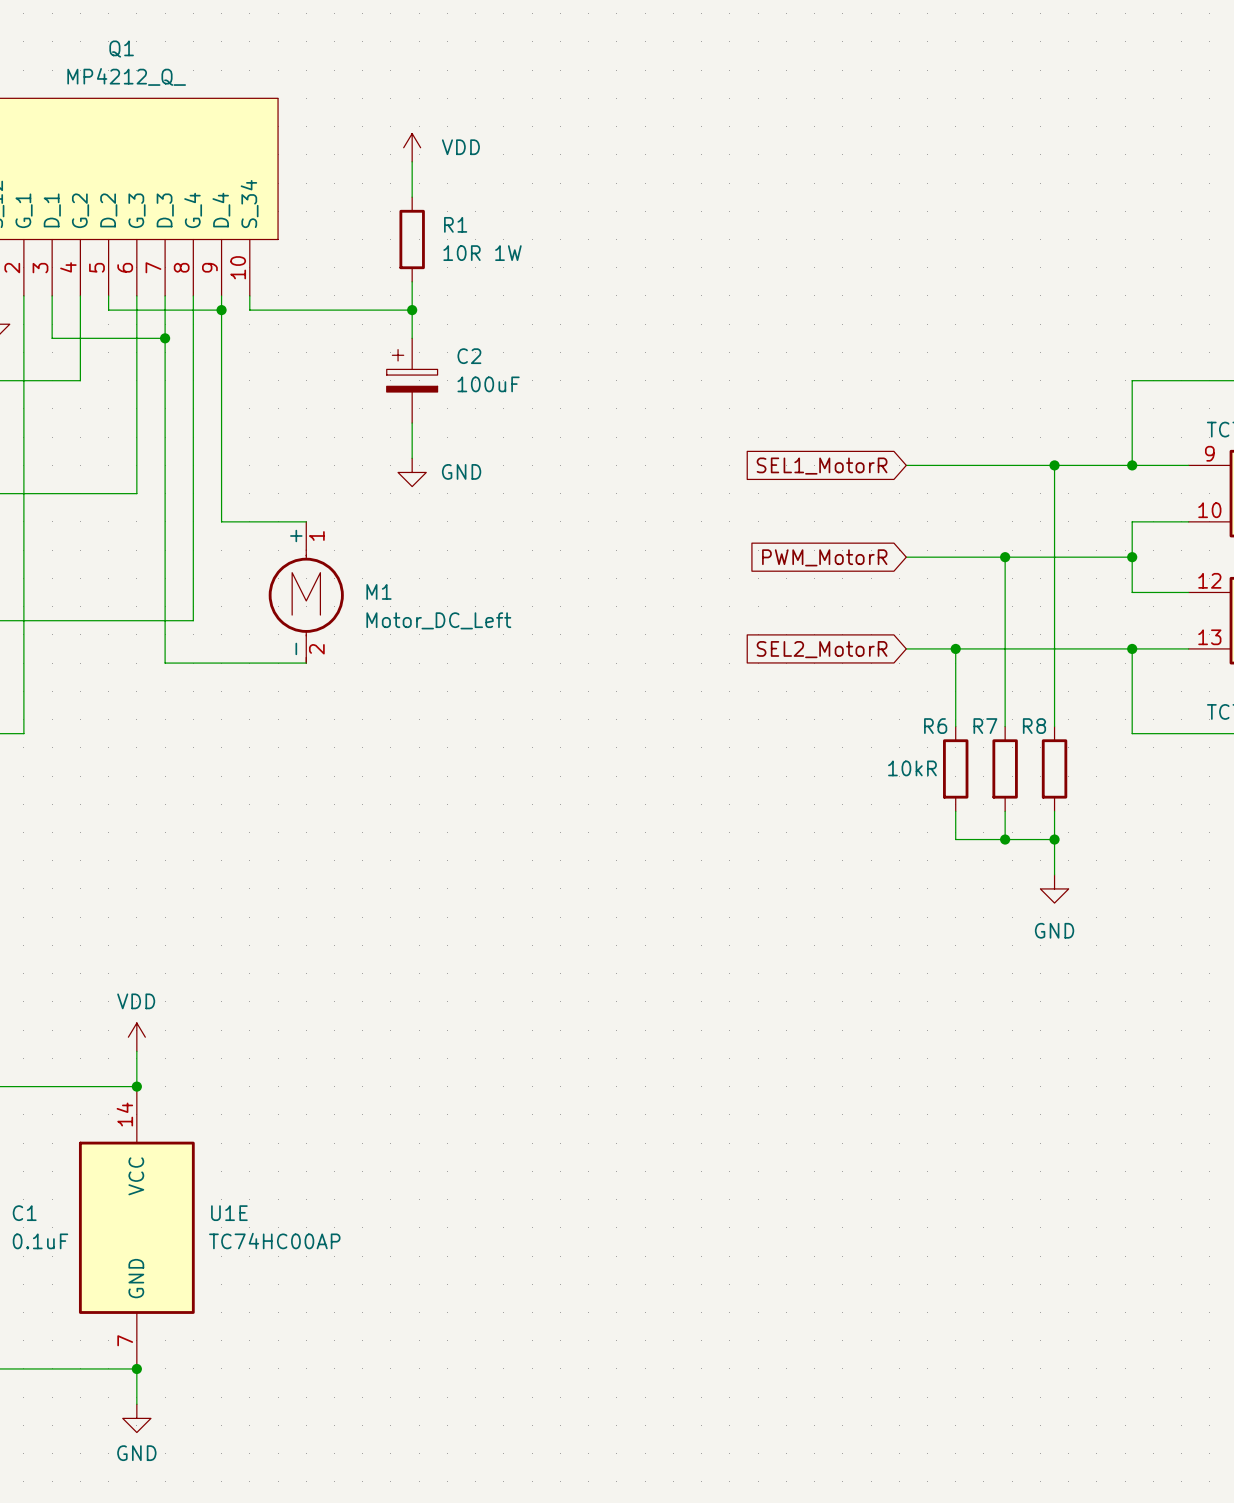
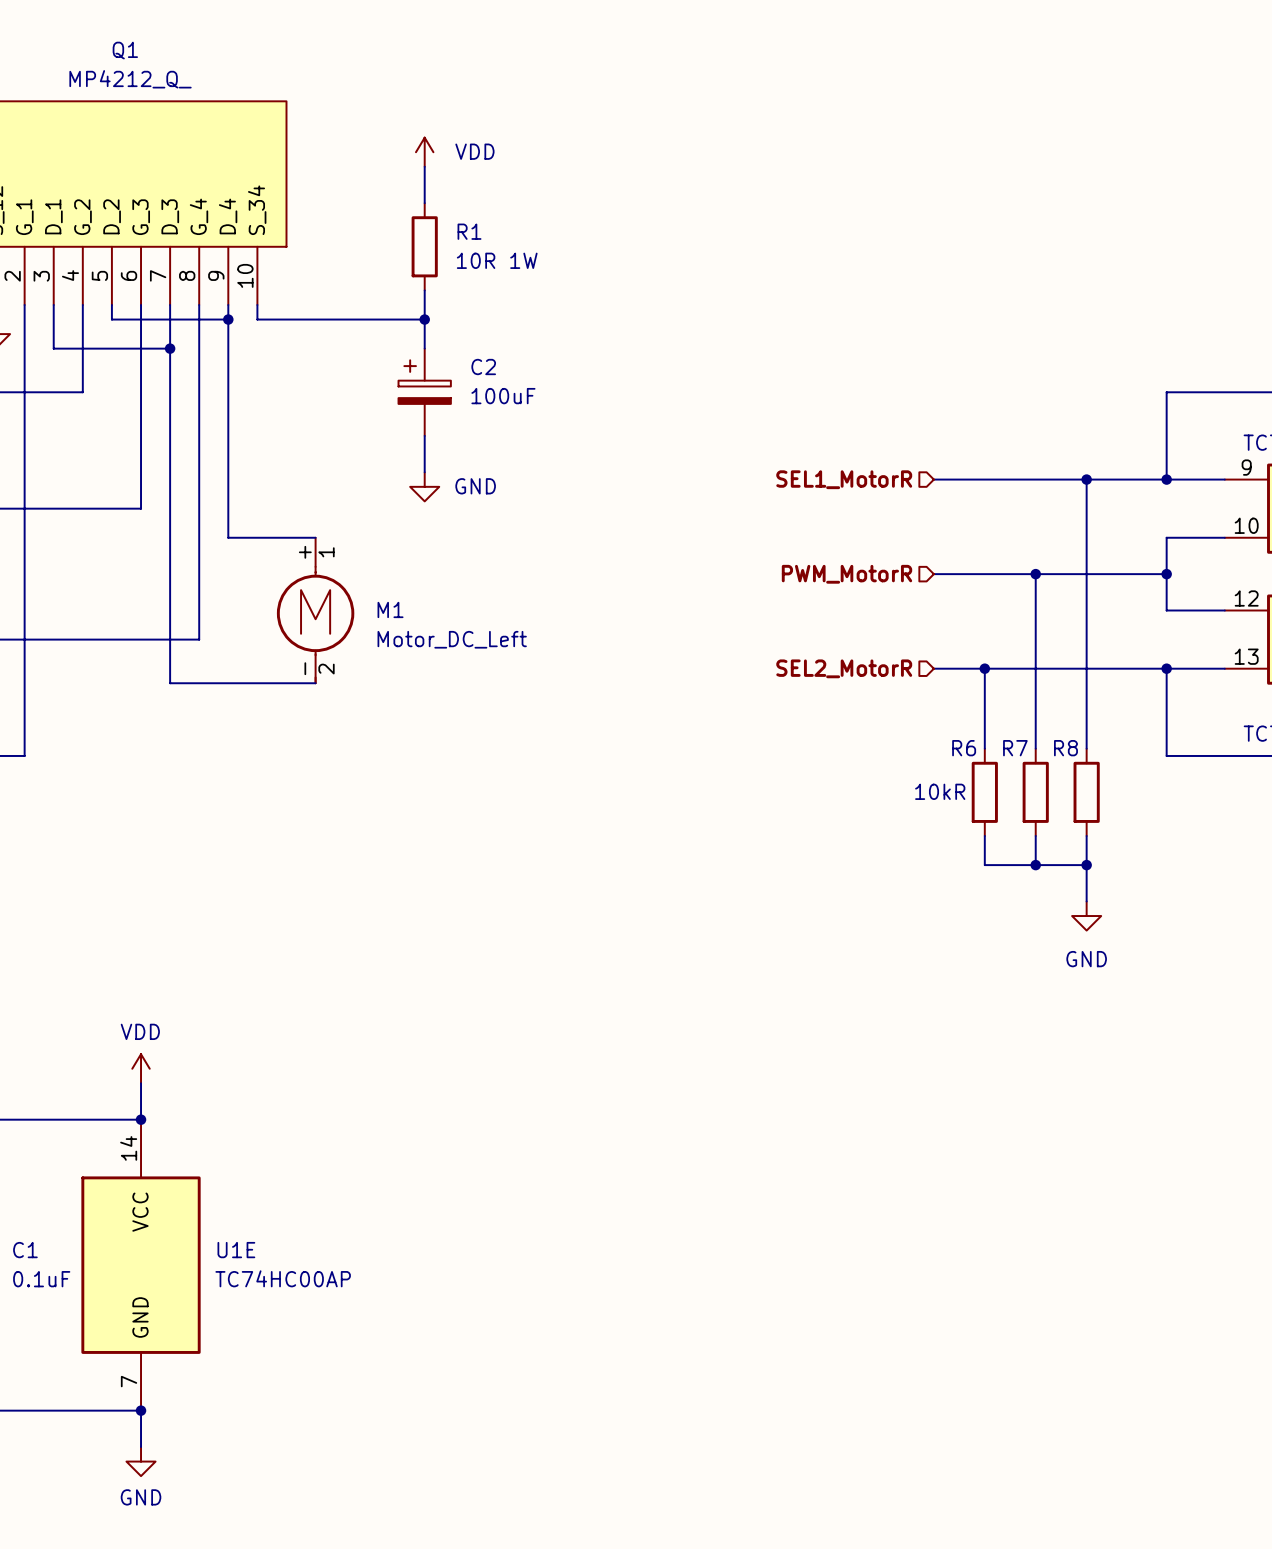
hierarchical label: none -> SEL1_MotorR (844, 479)
global label: SEL1_MotorR (822, 466) -> none
hierarchical label: none -> PWM_MotorR (846, 574)
global label: PWM_MotorR (824, 557) -> none
hierarchical label: none -> SEL2_MotorR (844, 668)
global label: SEL2_MotorR (822, 649) -> none

